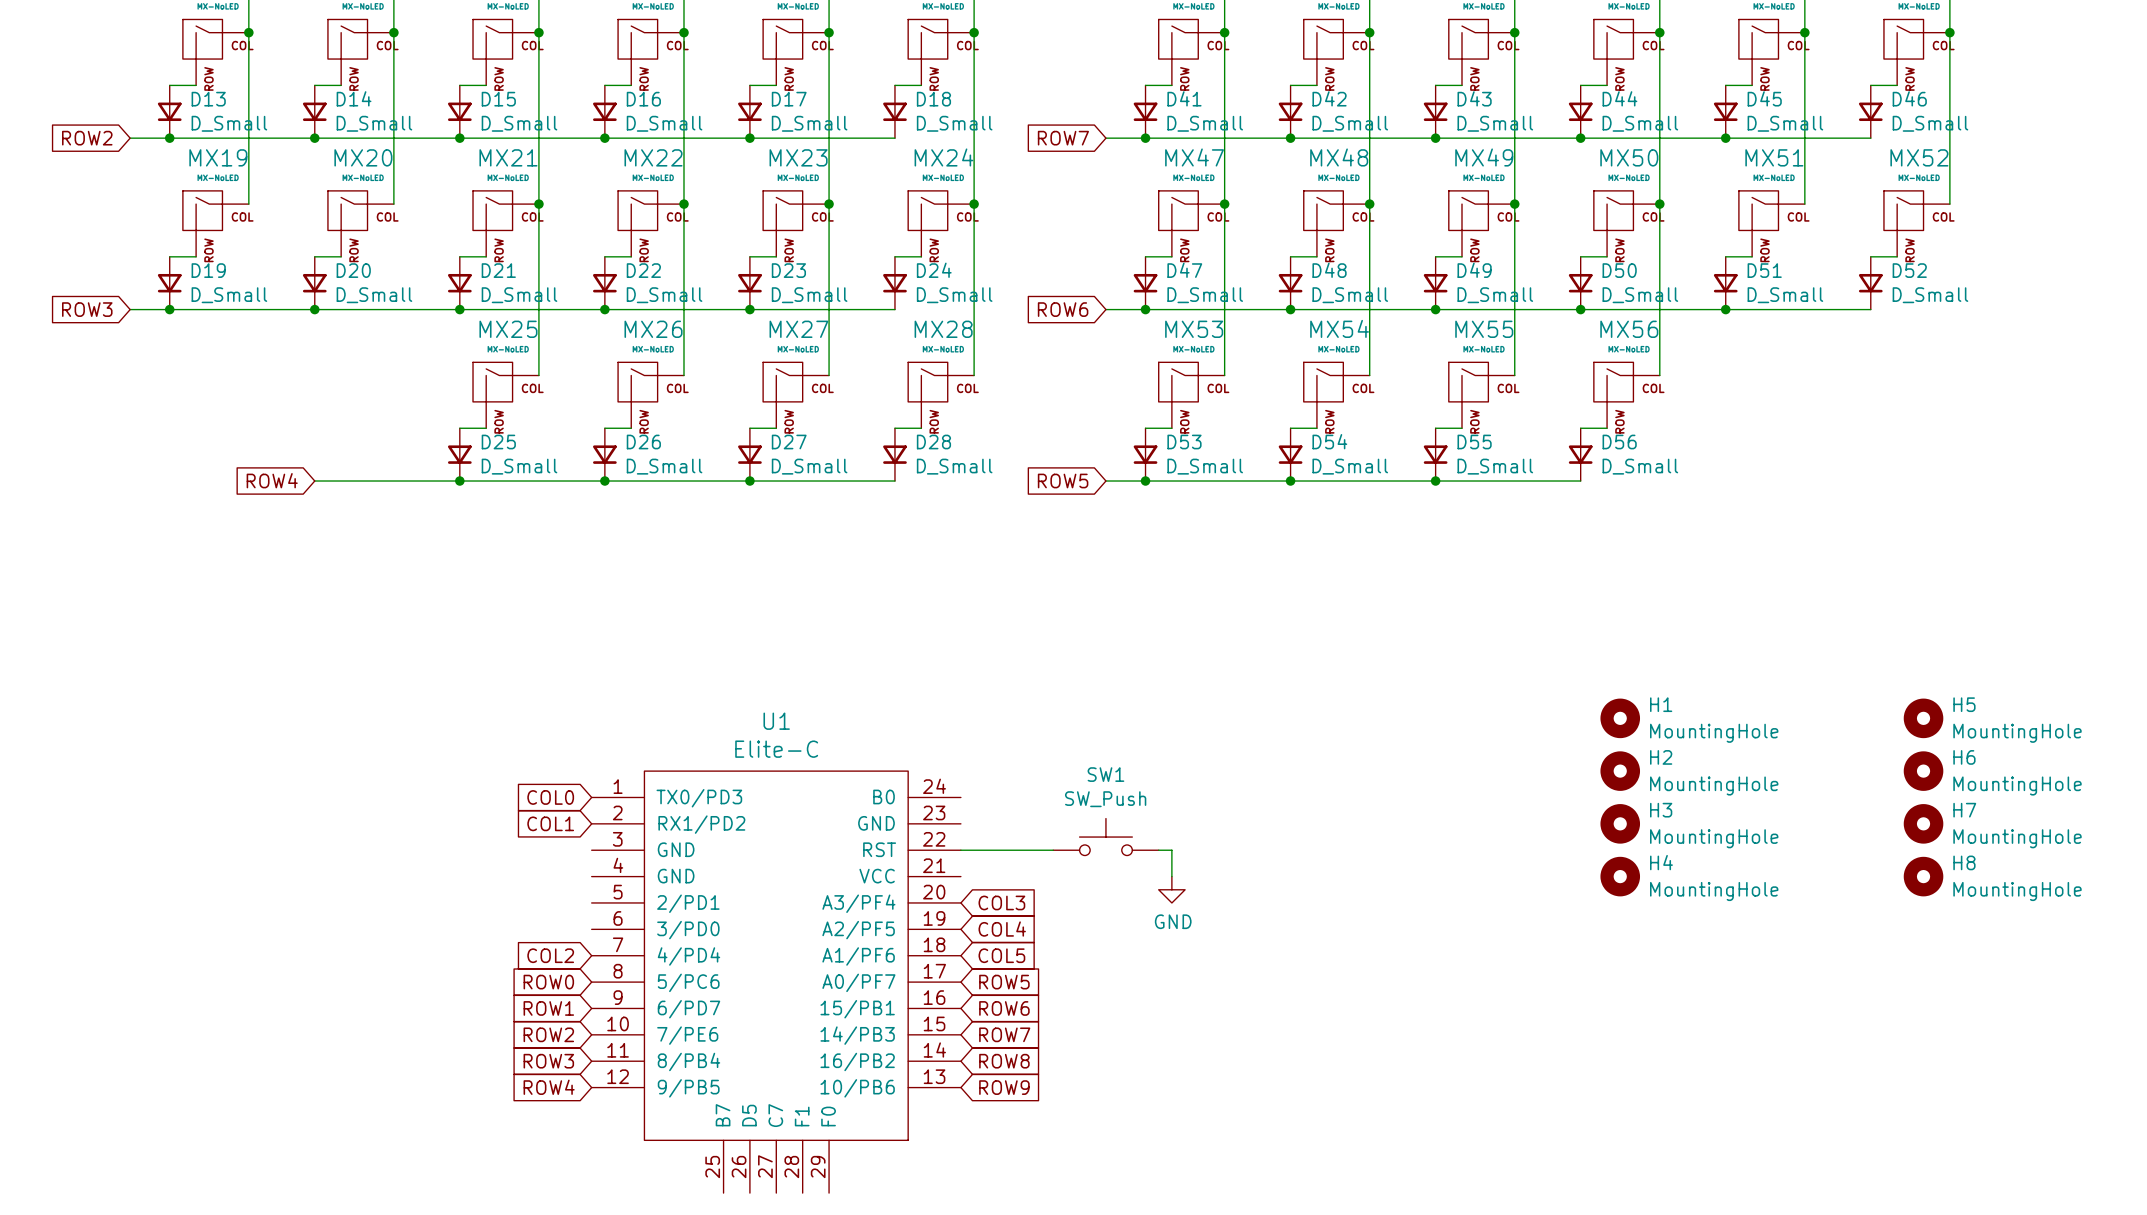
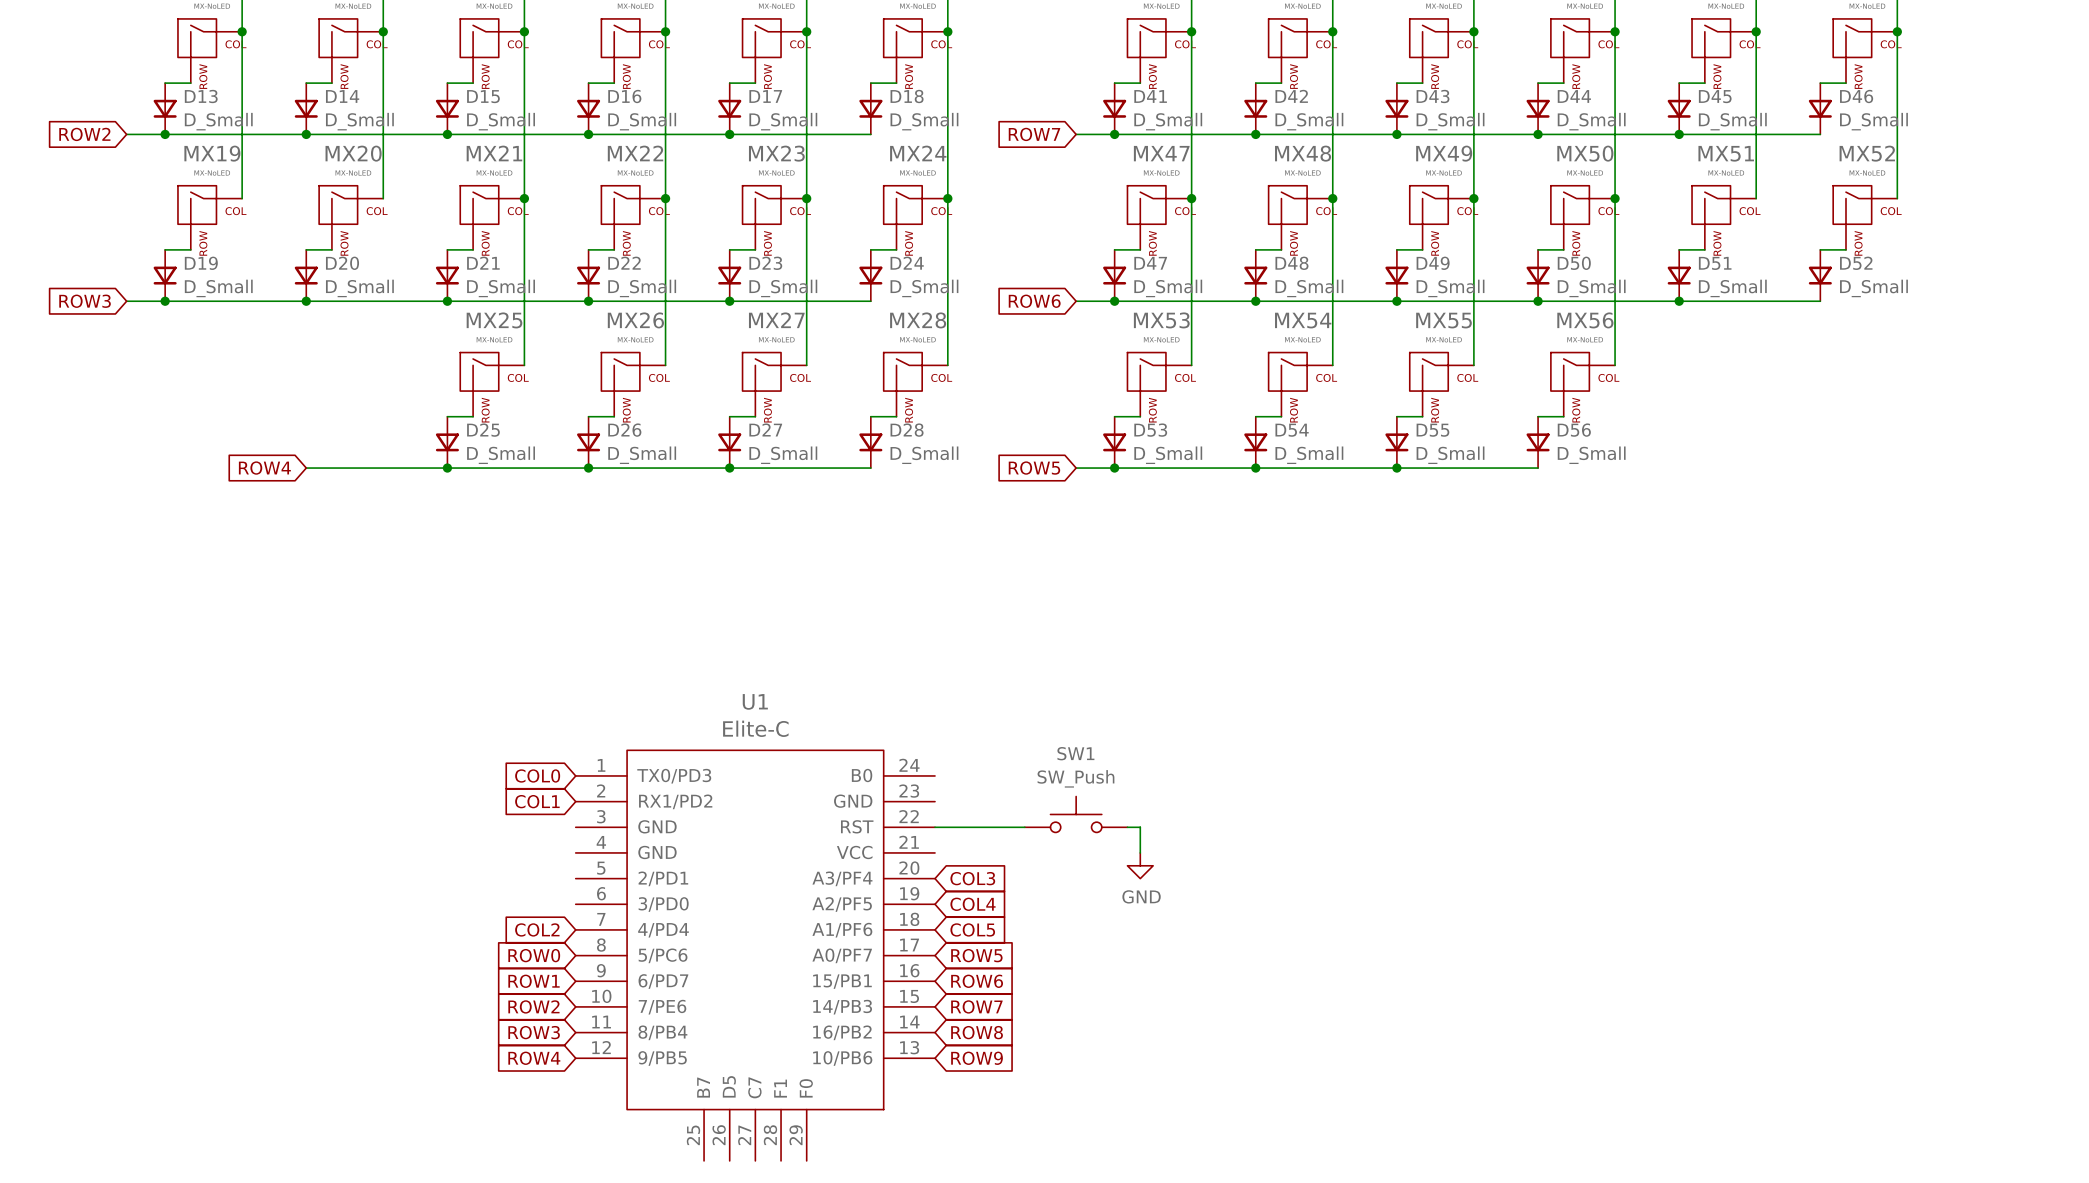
H1: MountingHole (1620, 718) -> none
H5: MountingHole (1923, 718) -> none
H2: MountingHole (1620, 771) -> none
H6: MountingHole (1923, 771) -> none
H3: MountingHole (1620, 823) -> none
H7: MountingHole (1923, 823) -> none
H4: MountingHole (1620, 876) -> none
H8: MountingHole (1923, 876) -> none

